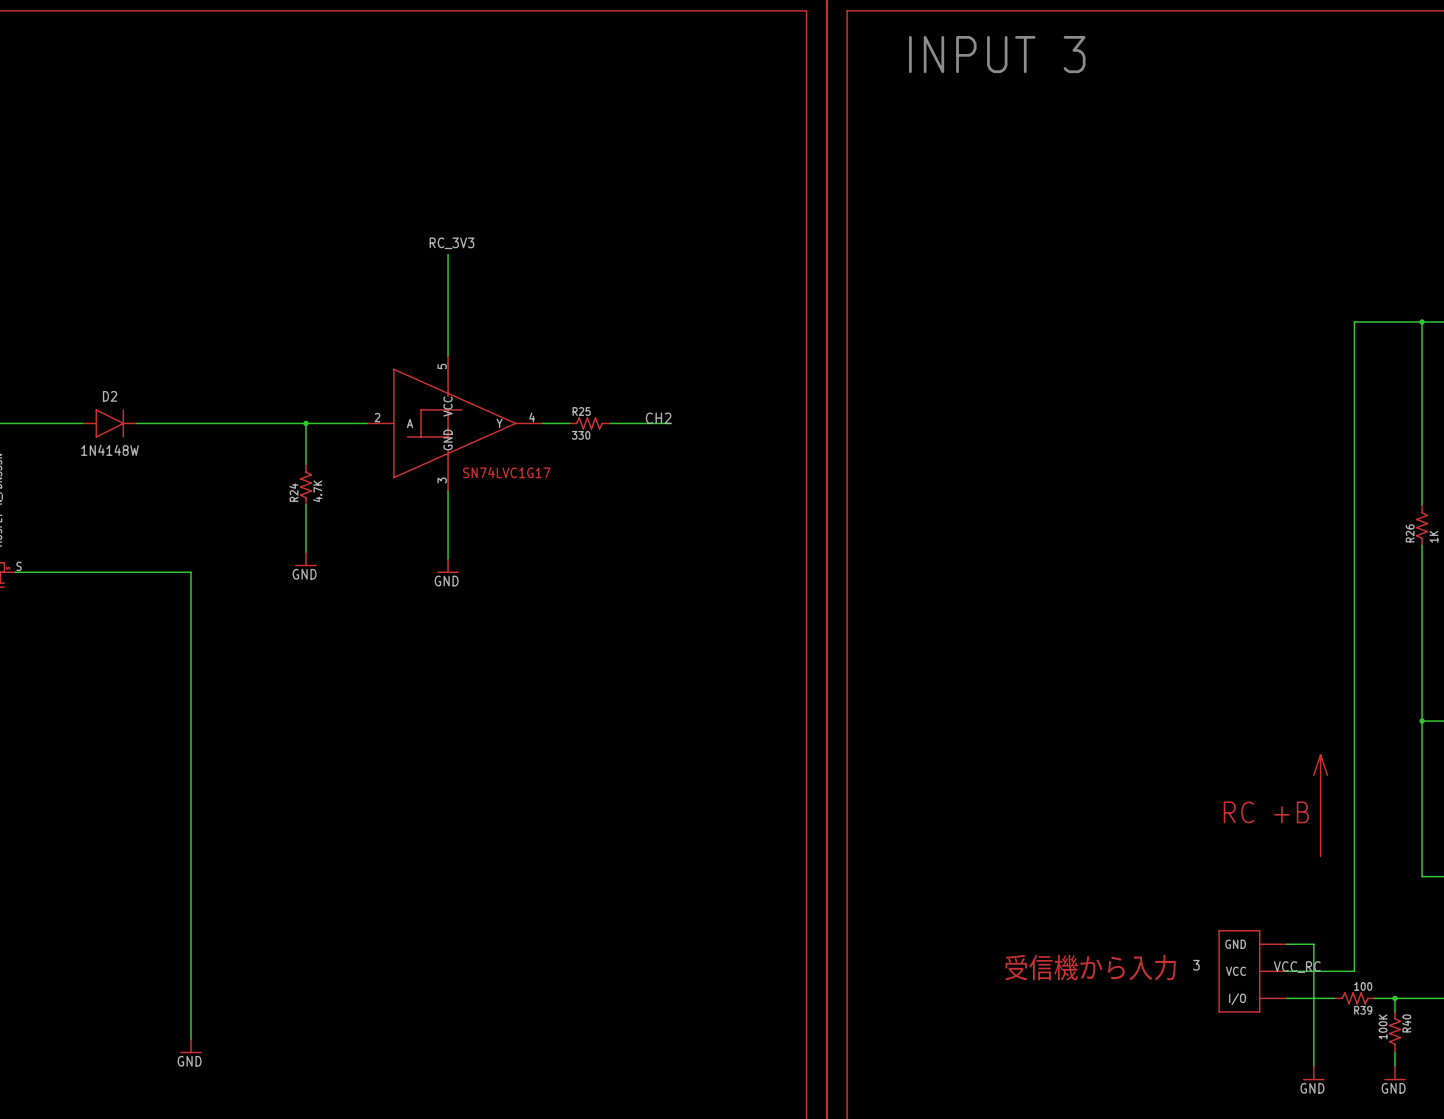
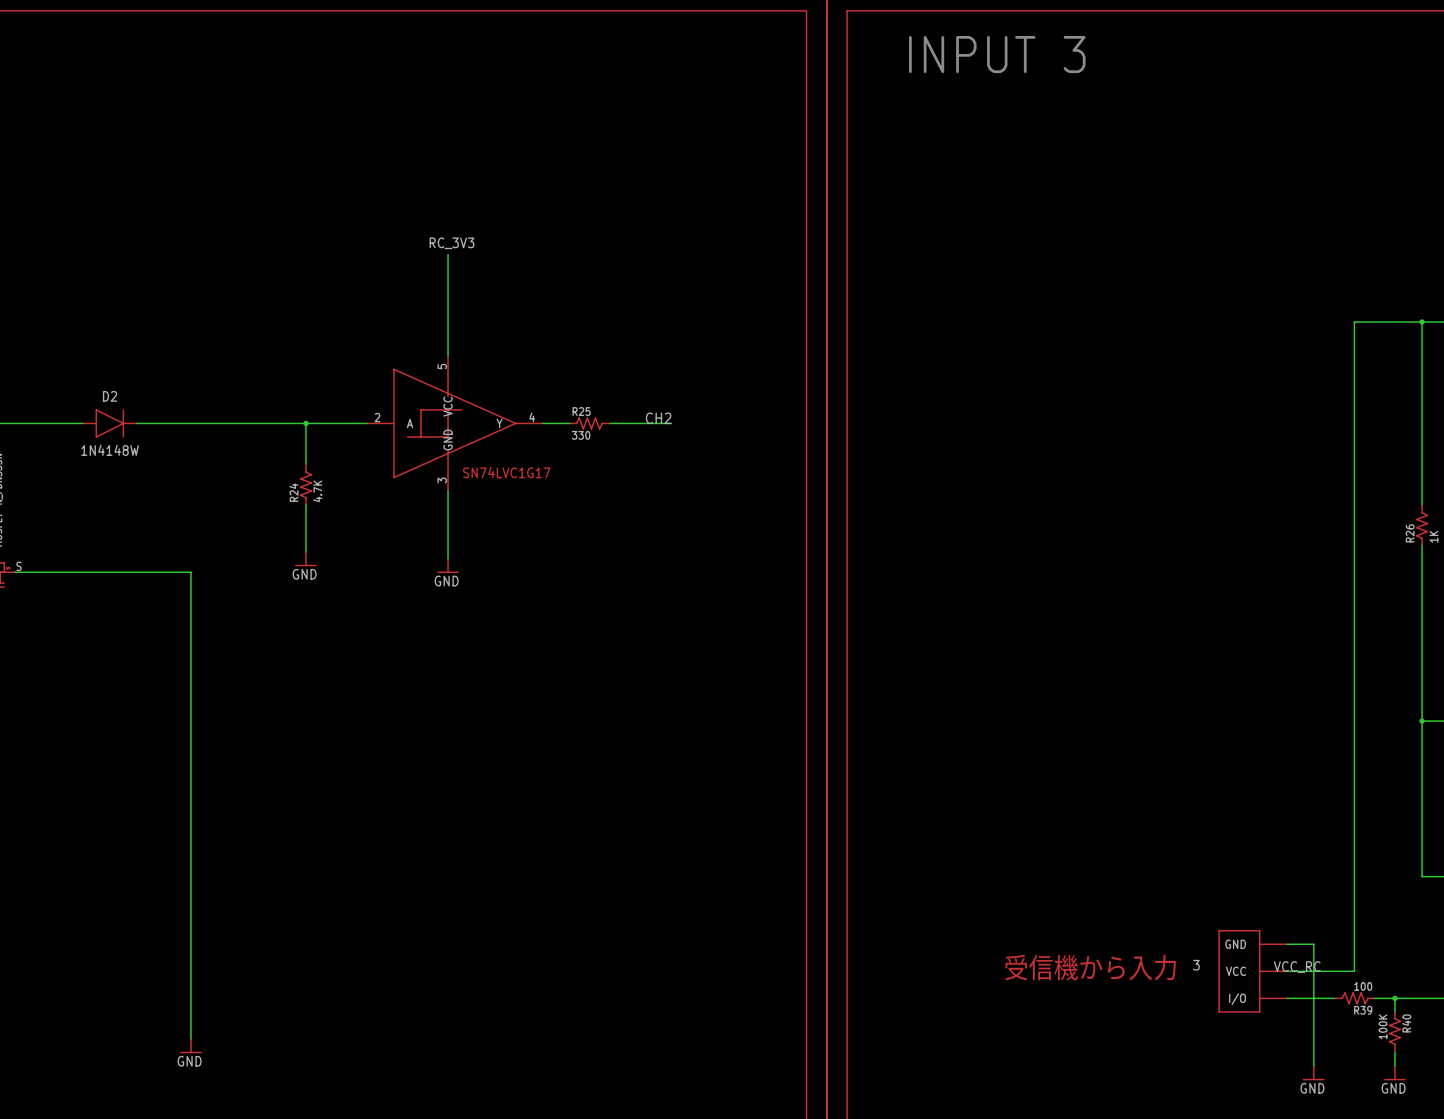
line: (1320, 754) (1320, 856) -> none
line: (1320, 754) (1313, 775) -> none
line: (1320, 754) (1327, 775) -> none
text: RC +B (1266, 812) -> none

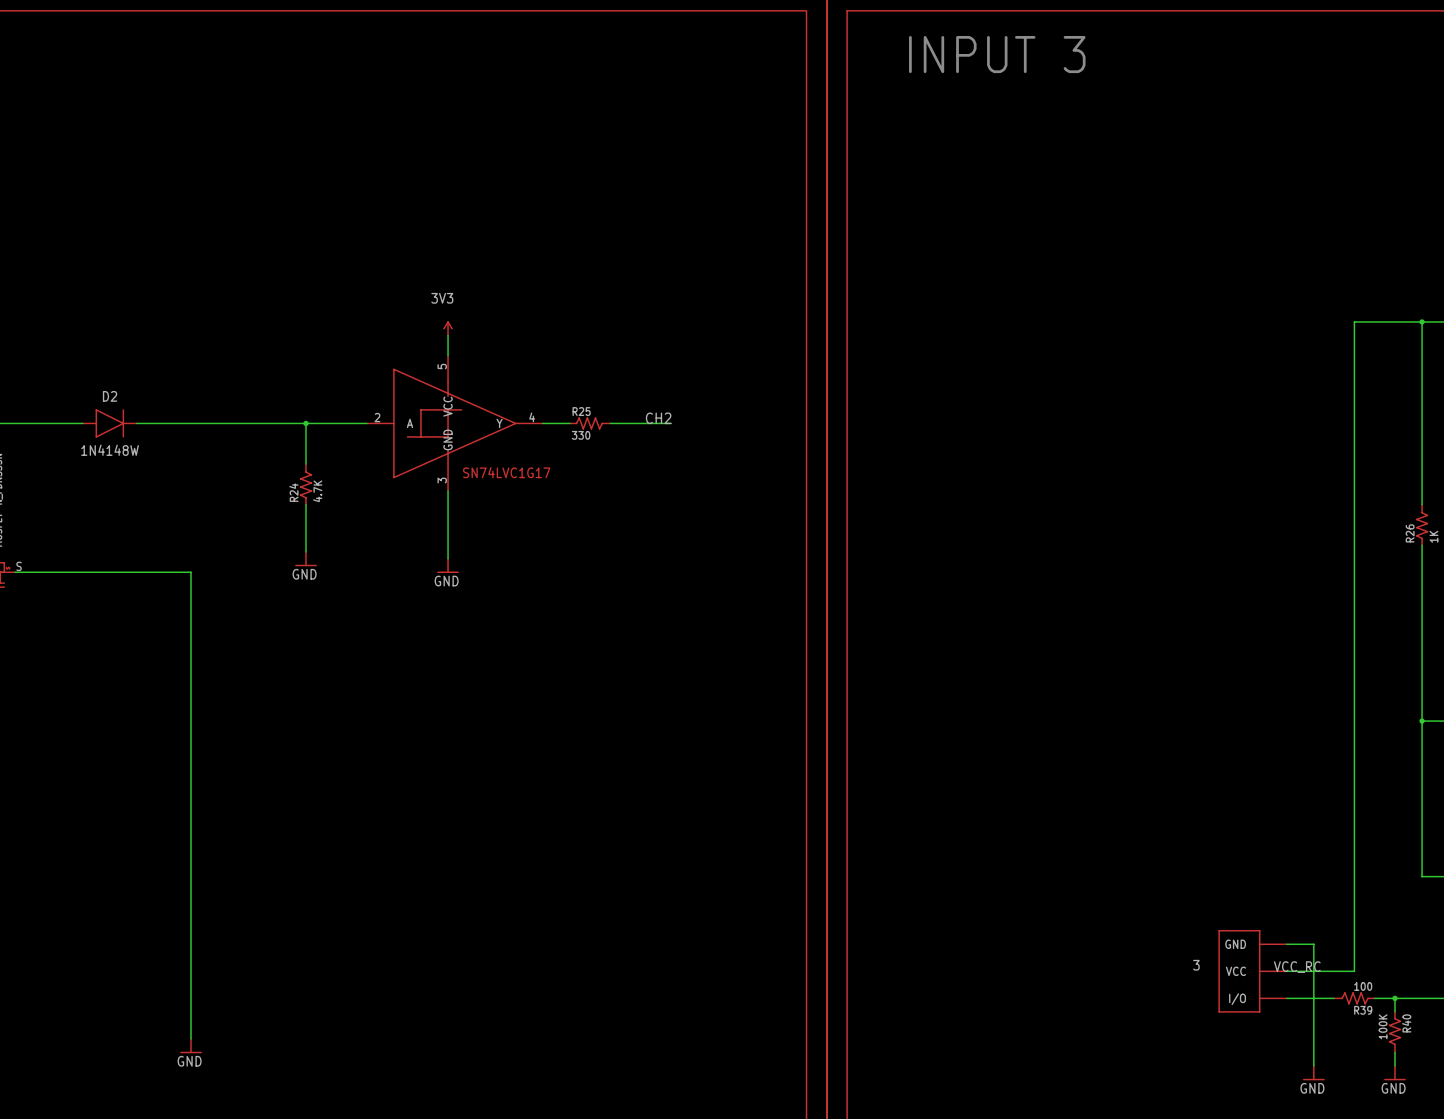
label: RC_3V3 (451, 243) -> none
wire: (448, 254) (448, 335) -> none
power symbol: none -> 3V3 (448, 328)
text: 受信機から入力 (1090, 967) -> none

